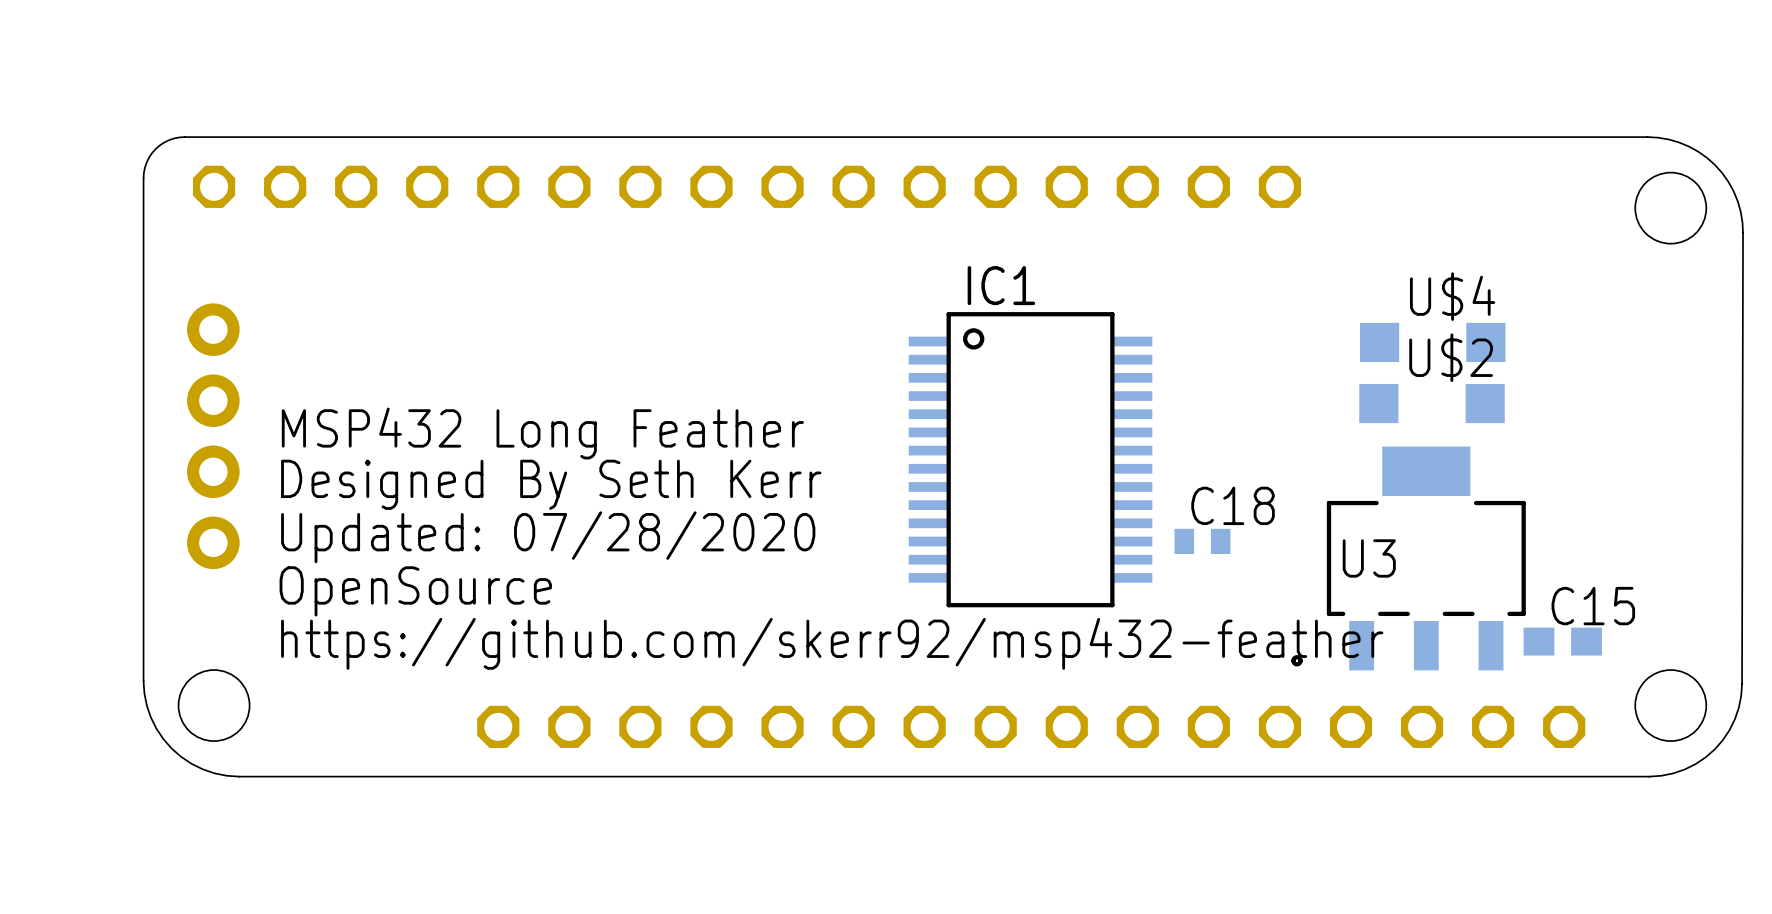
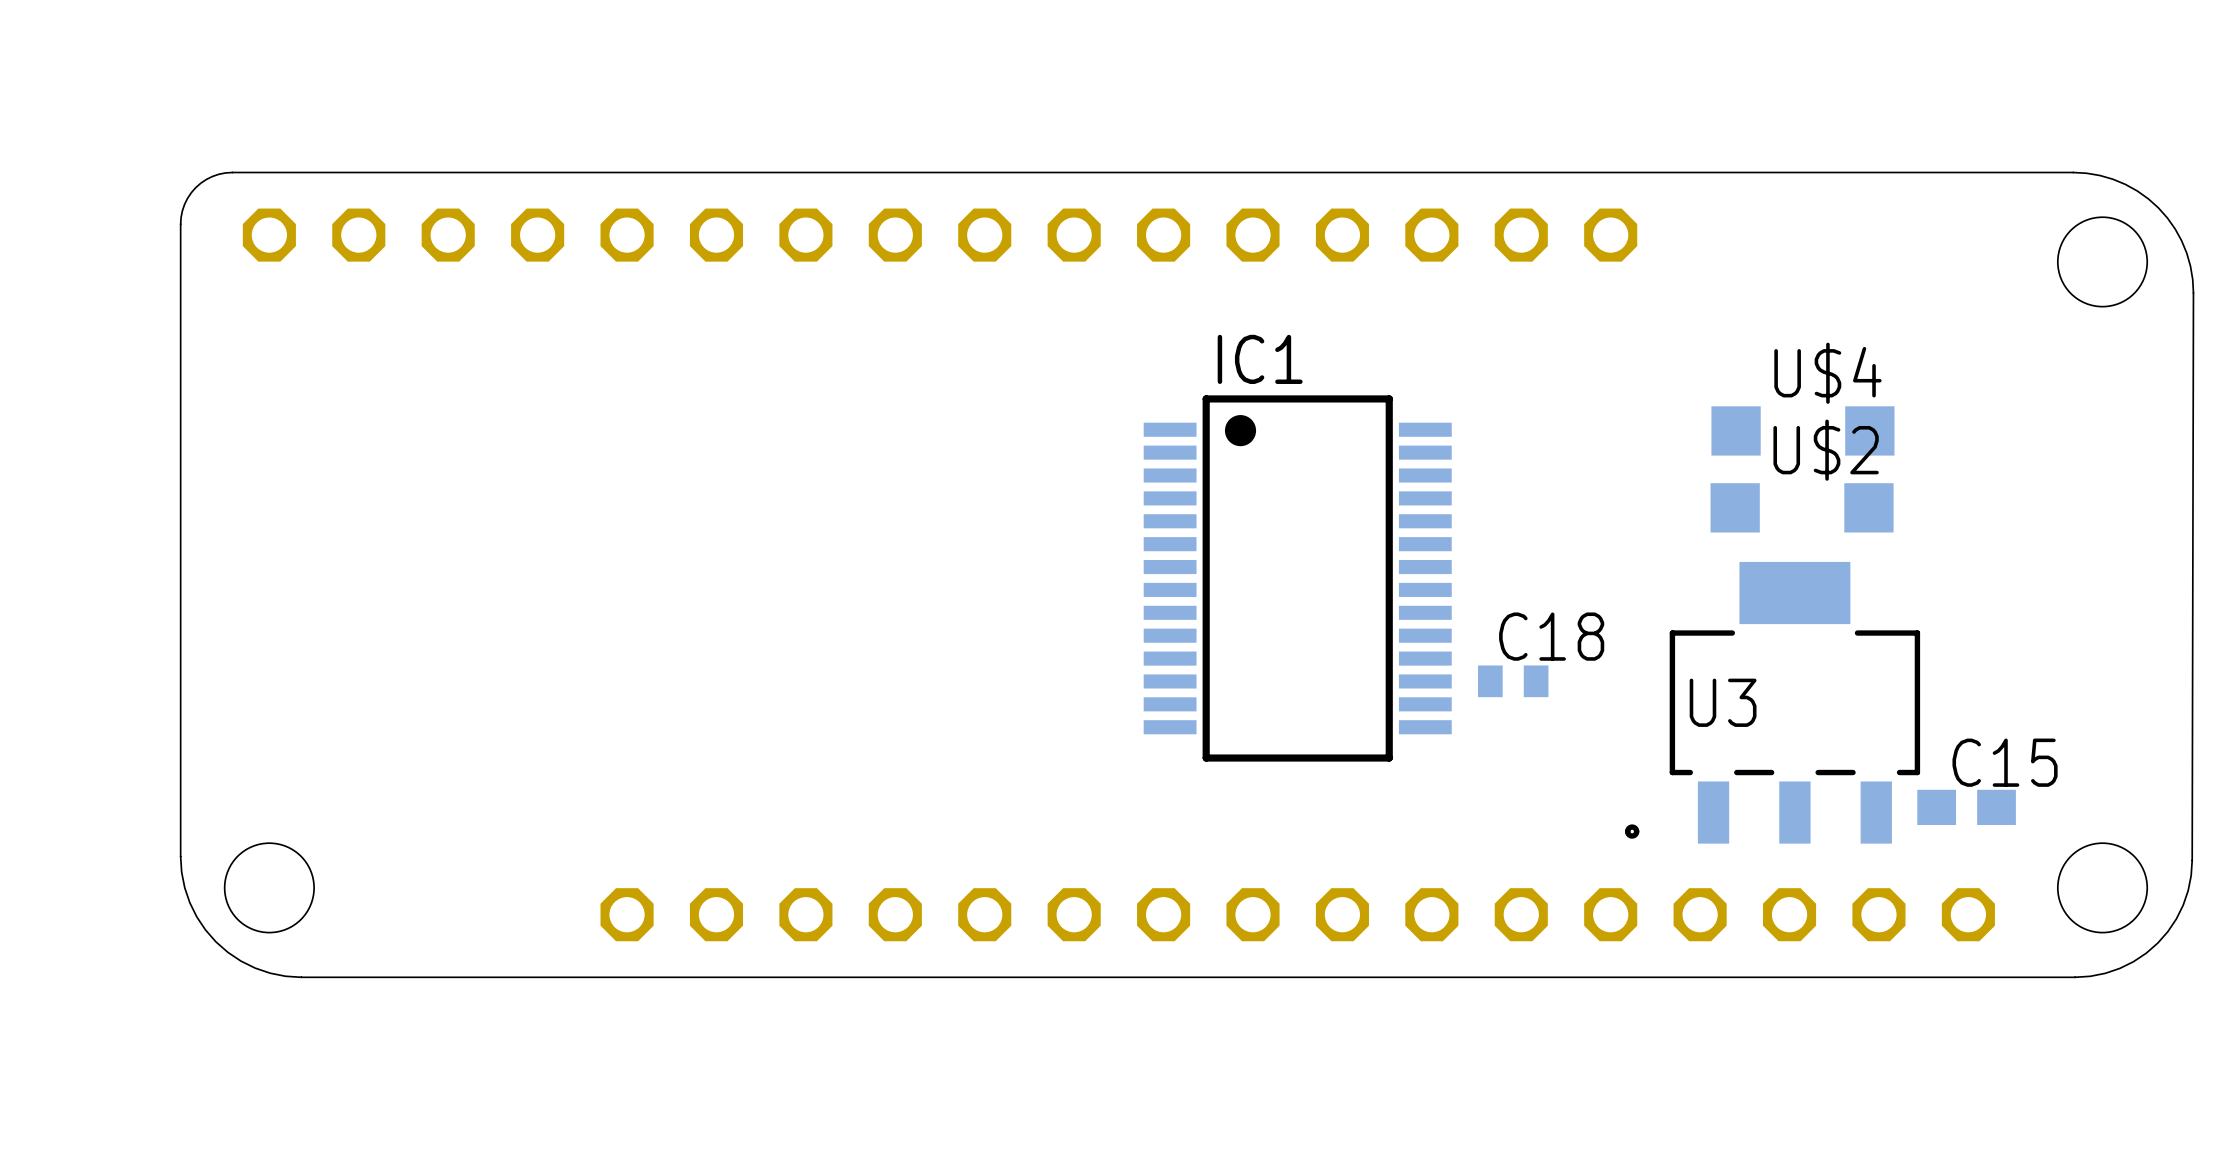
IC1 footprint: [908, 312, 1153, 608] -> [1143, 395, 1452, 762]
text: MSP432 Long Feather (542, 433) -> none
part: (213, 436) -> none
text: Designed By Seth Kerr (551, 484) -> none
text: Updated: 07/28/2020 (548, 537) -> none
text: OpenSource (415, 591) -> none
text: https://github.com/skerr92/msp432-feather (832, 643) -> none

